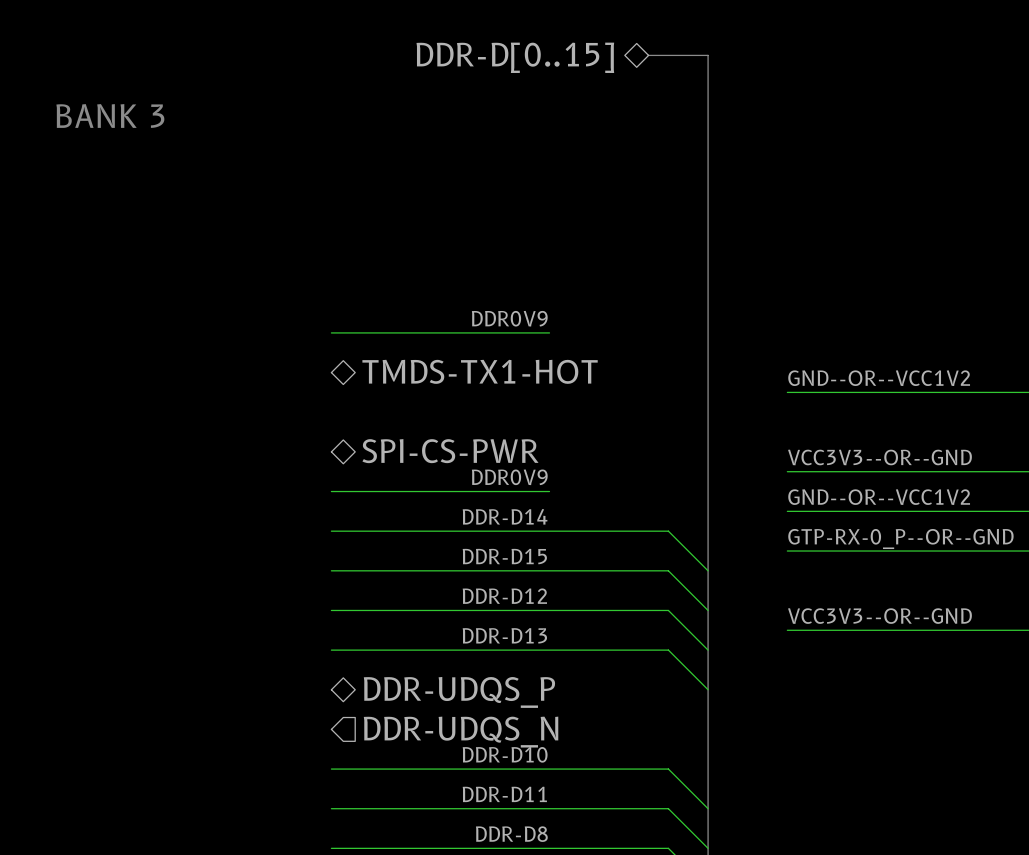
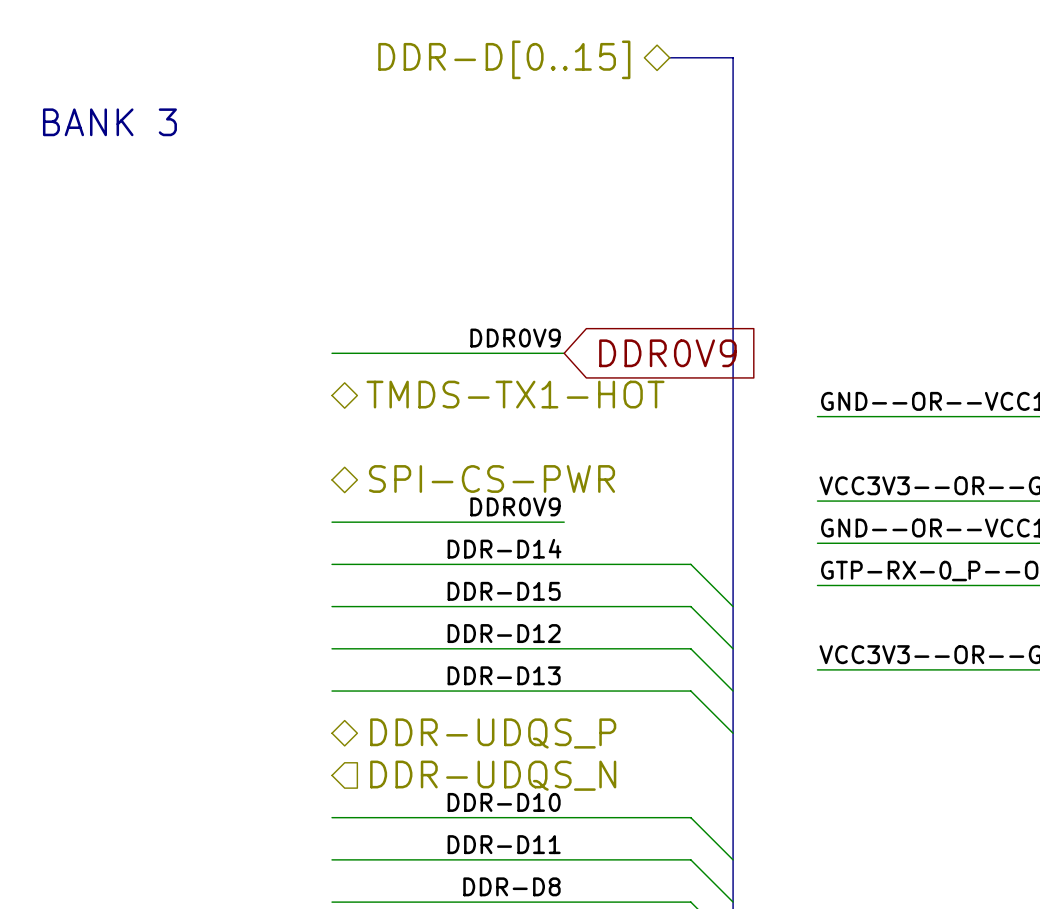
global label: none -> DDR0V9 (667, 353)

